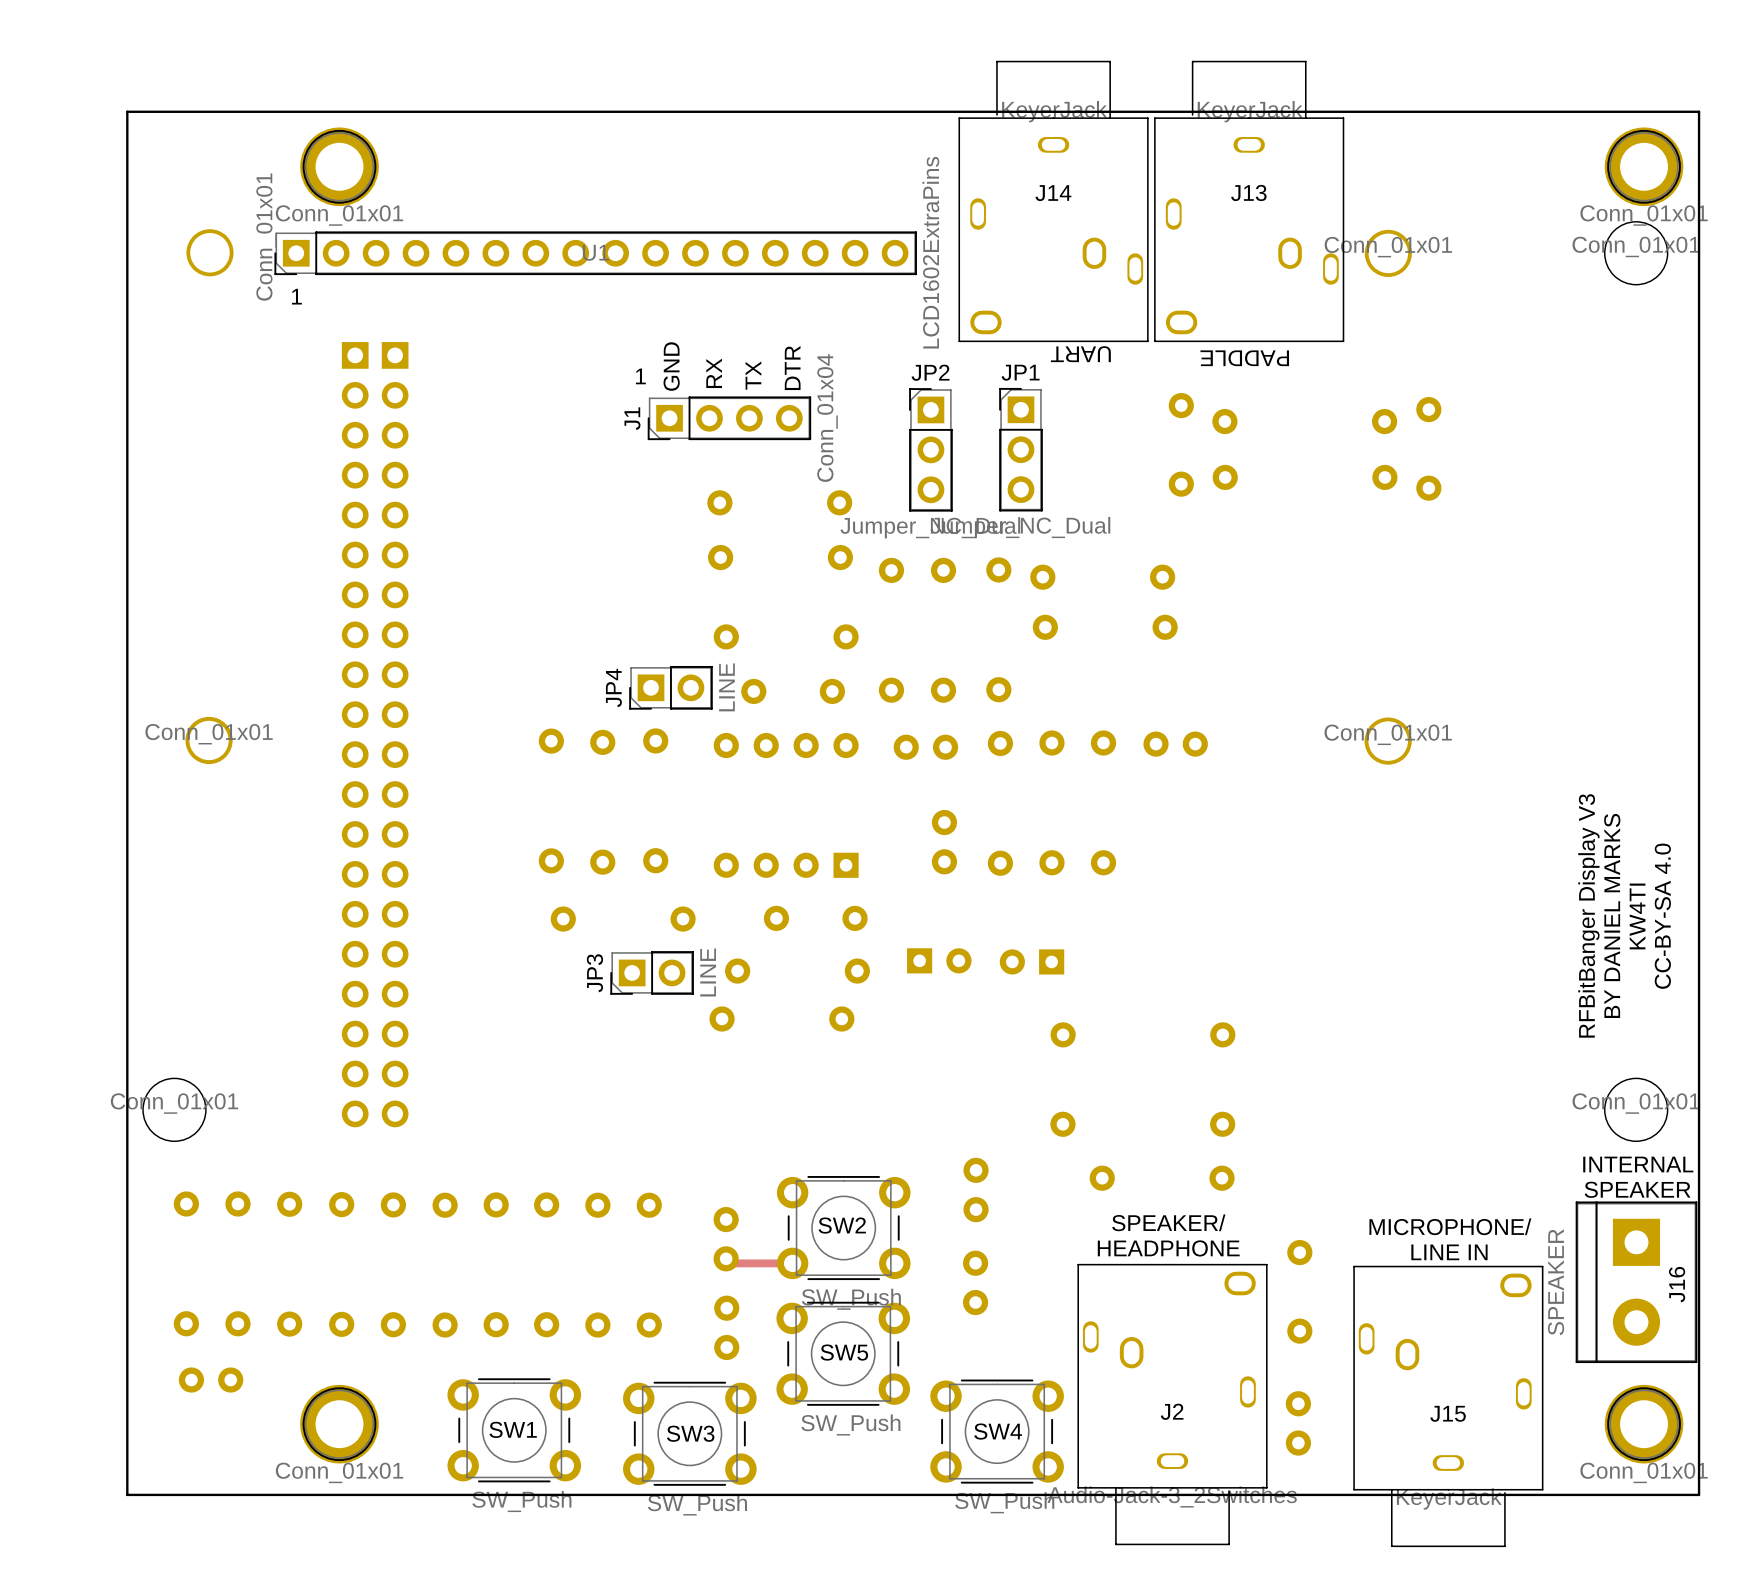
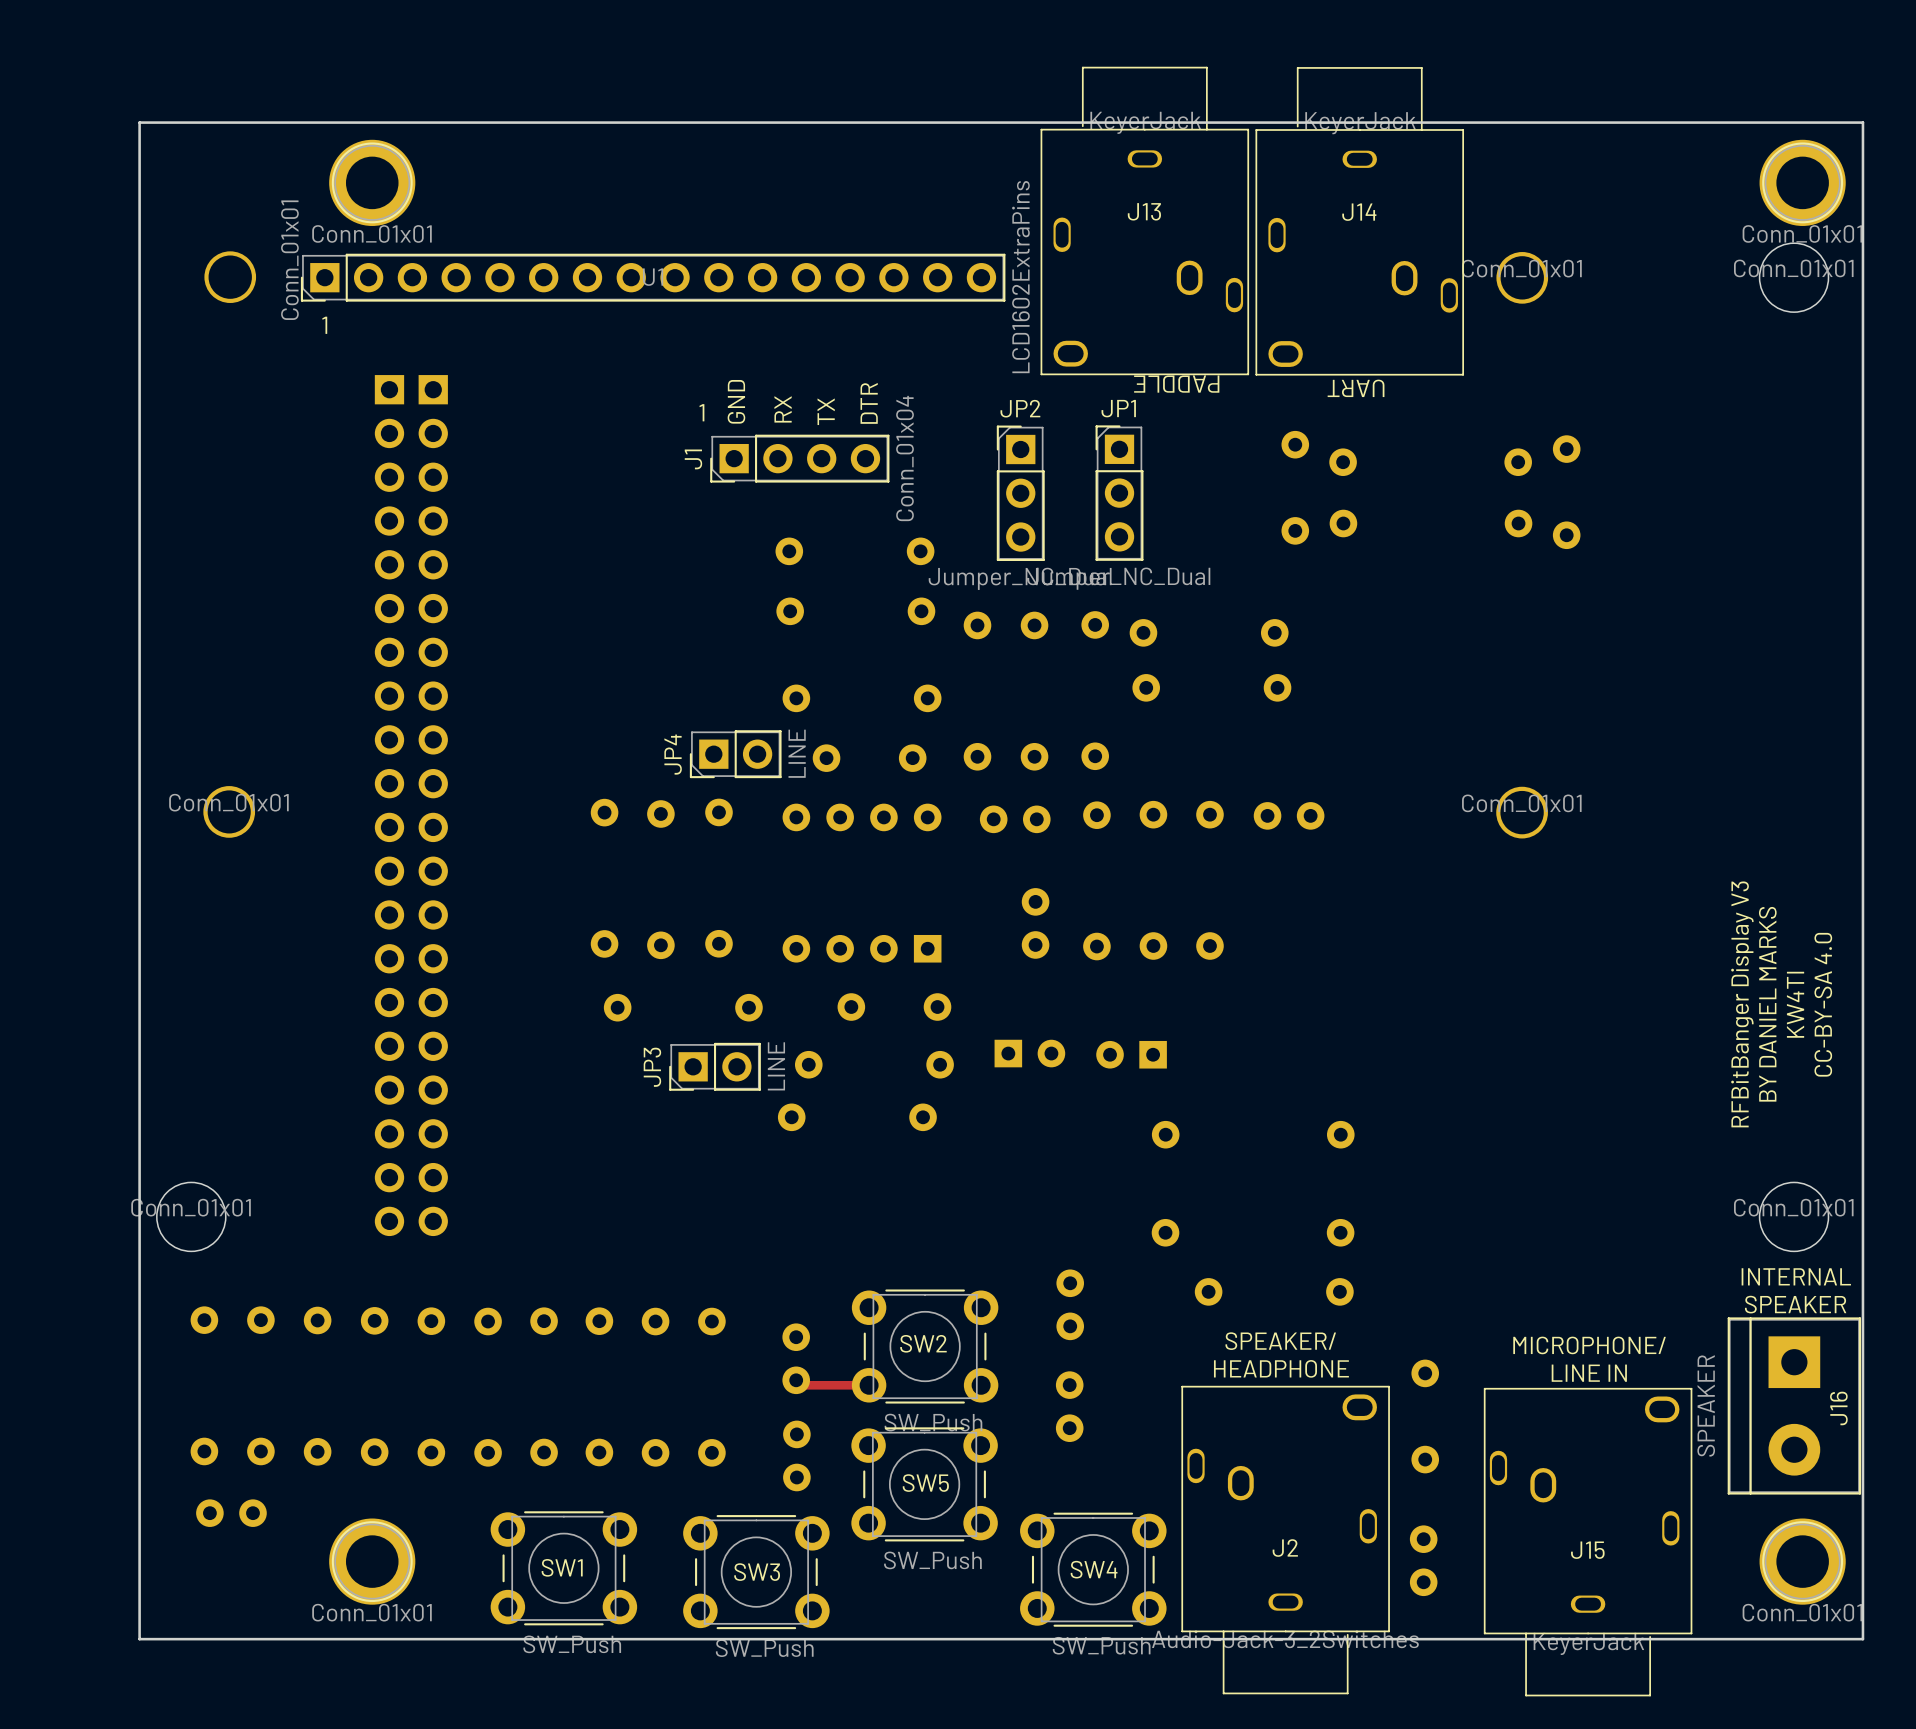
J14 position: (1053, 201) -> (1359, 221)
J13 position: (1249, 201) -> (1144, 220)
text: UART (1080, 354) -> PADDLE (1176, 384)
text: PADDLE (1244, 358) -> UART (1356, 388)

